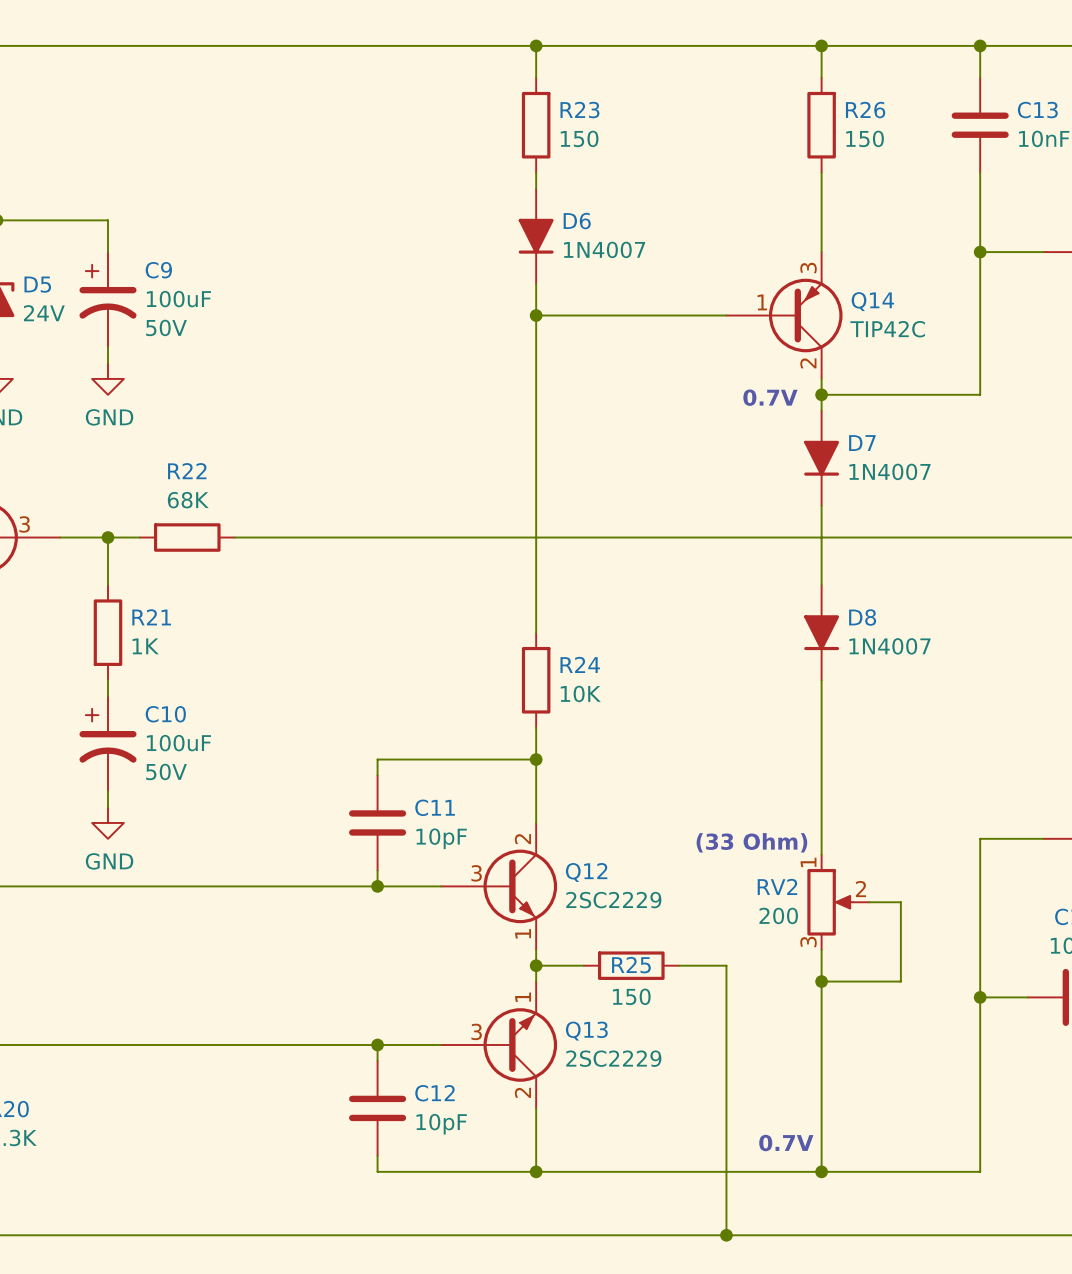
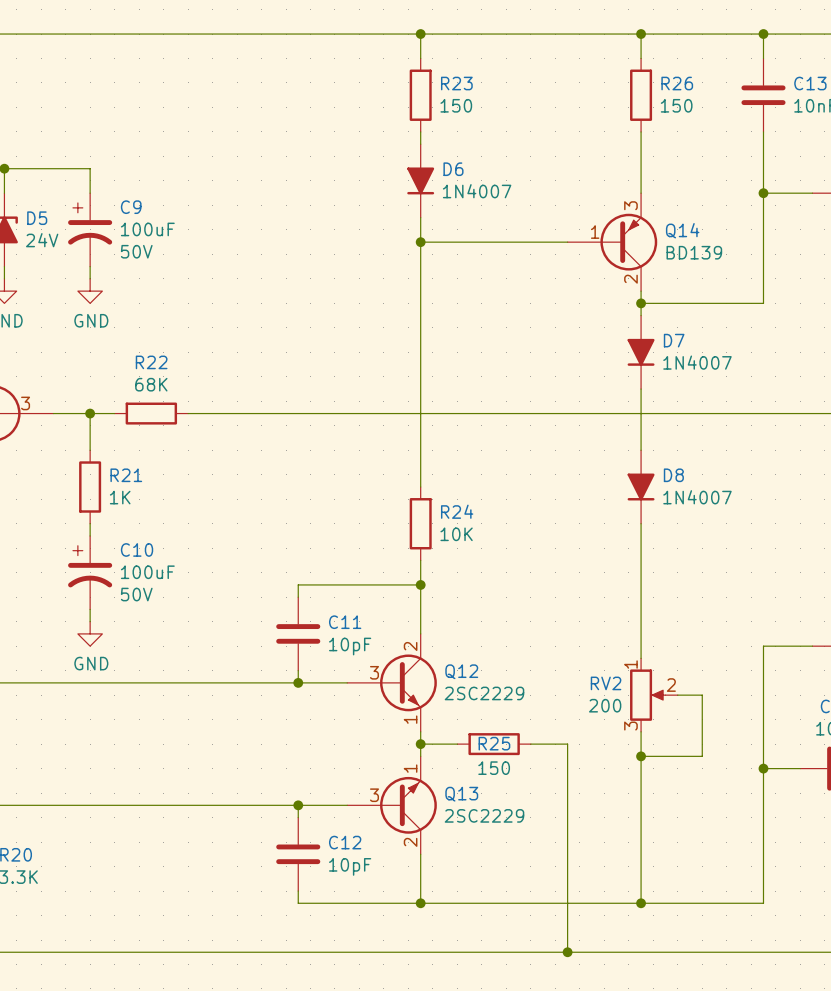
Q14 value: TIP42C (887, 329) -> BD139 (694, 252)
text: 0.7V (770, 397) -> none
text: (33 Ohm) (751, 842) -> none
text: 0.7V (786, 1143) -> none

